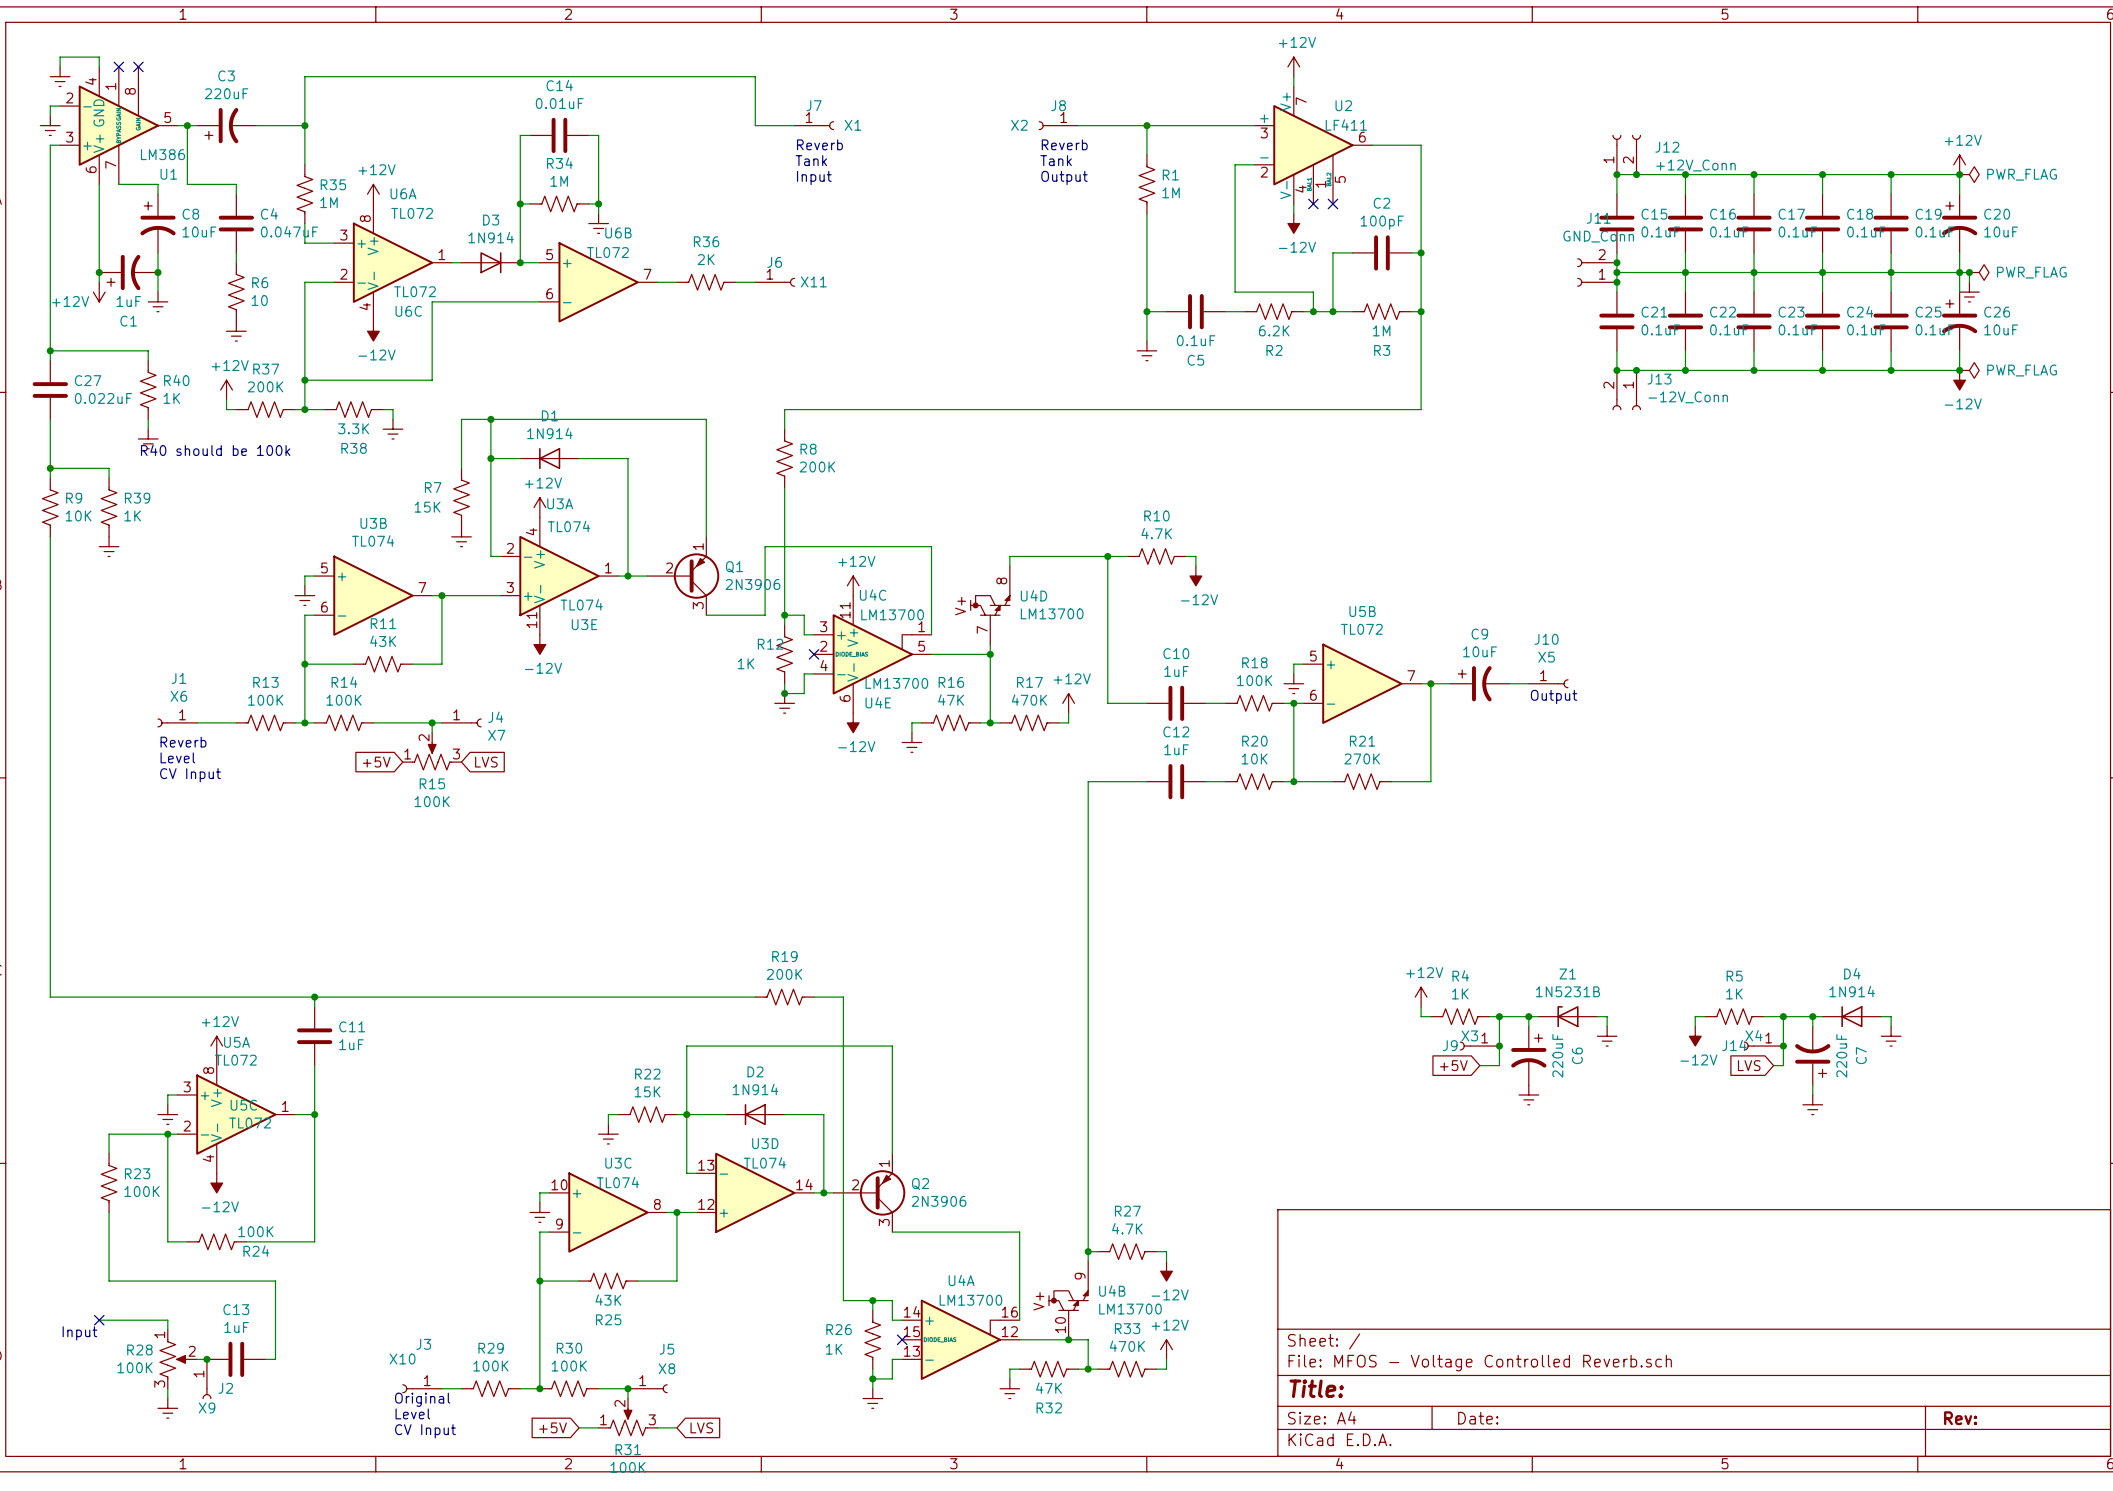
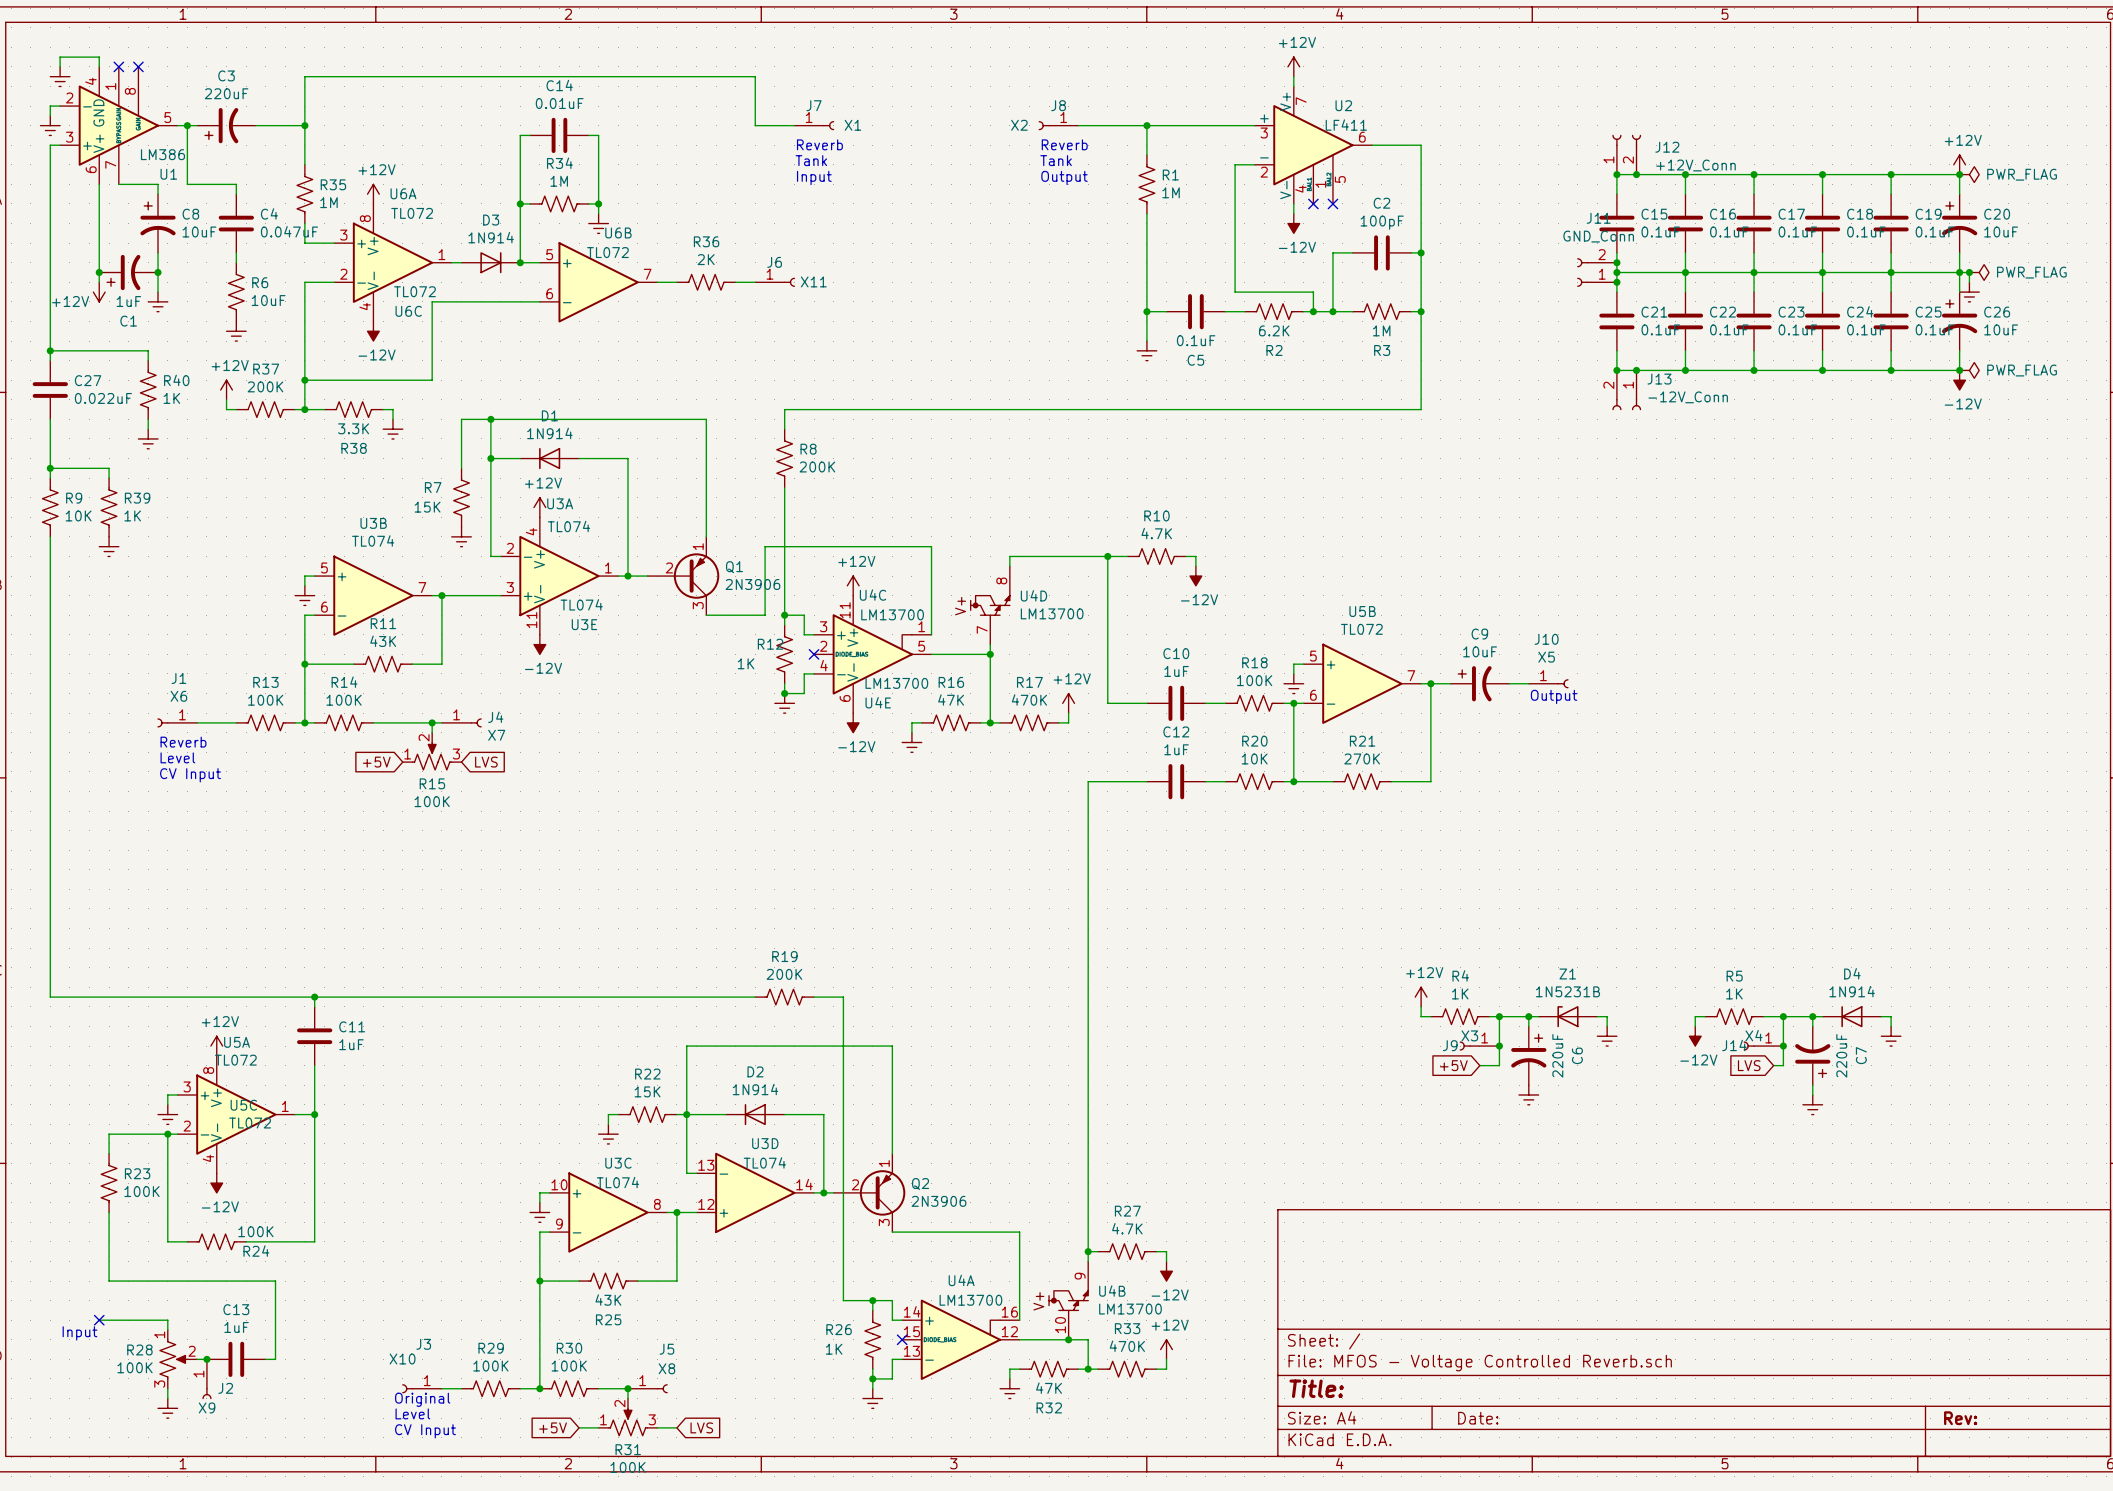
R6 value: 10 (259, 300) -> 10uF (268, 300)
text: R40 should be 100k (215, 450) -> none

